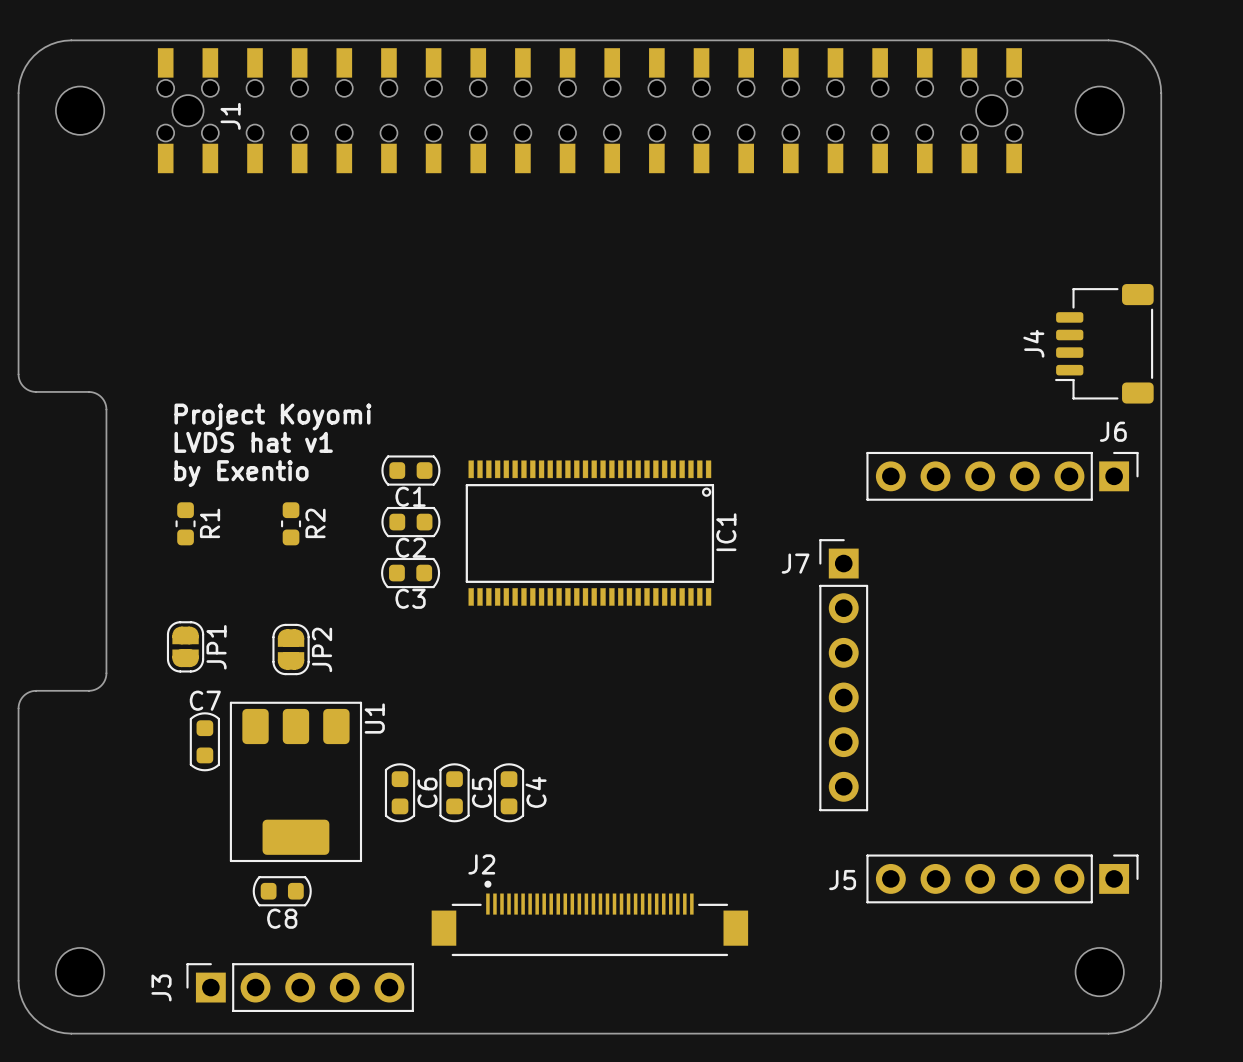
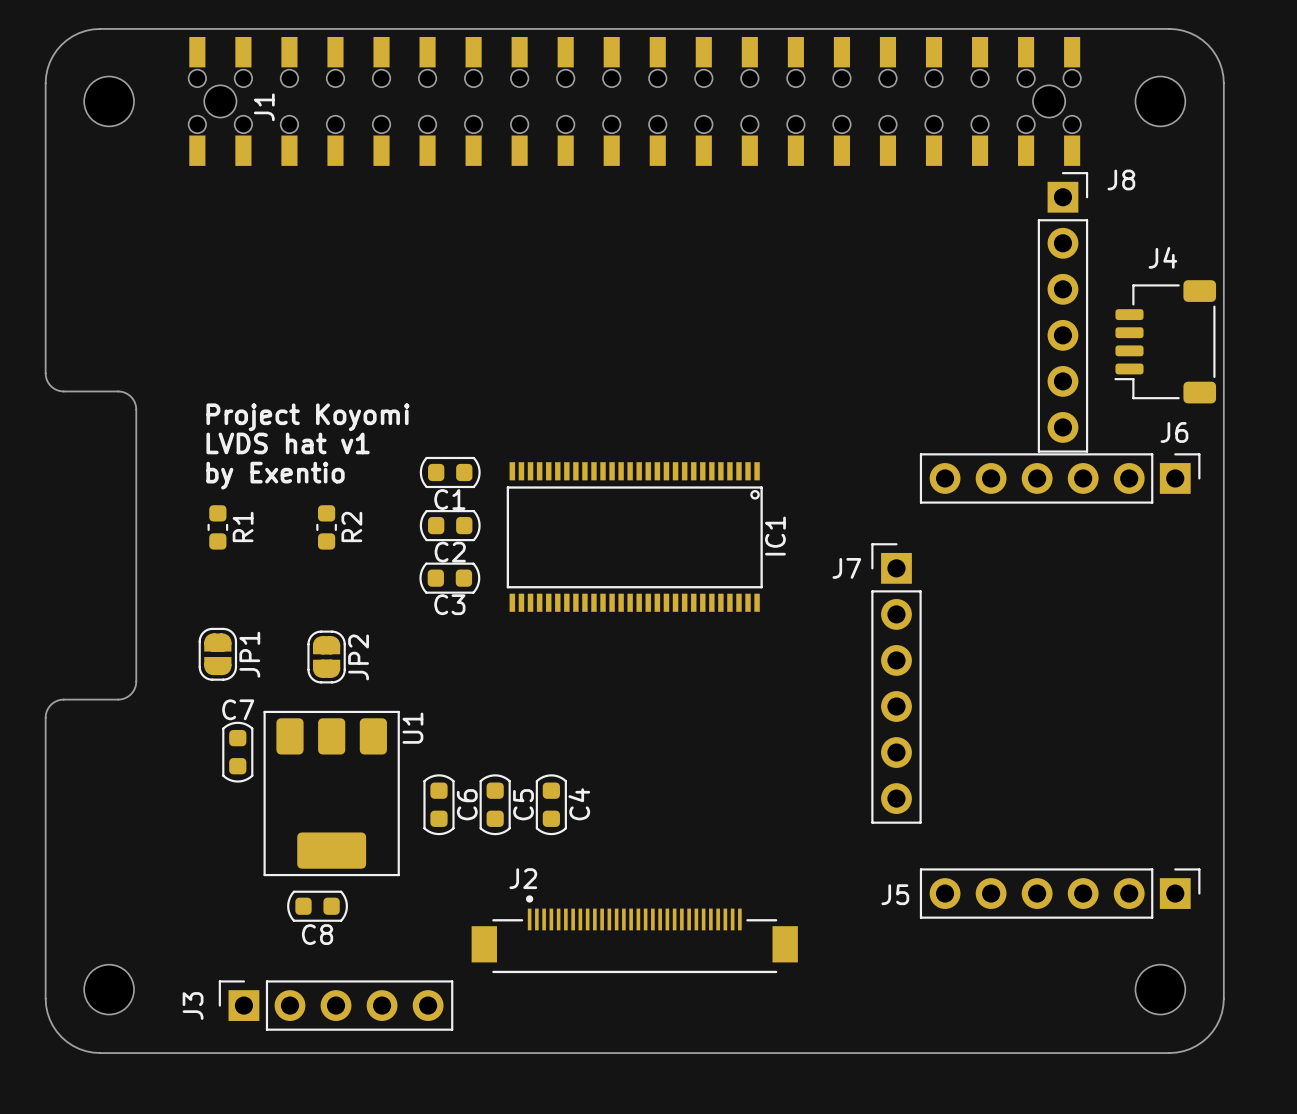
J8: none -> (1062, 312)
J4 name rotation: 0° (1033, 343) -> 90° clockwise (1162, 257)
J4 name position: J4 (1033, 343) -> J4 (1162, 257)

